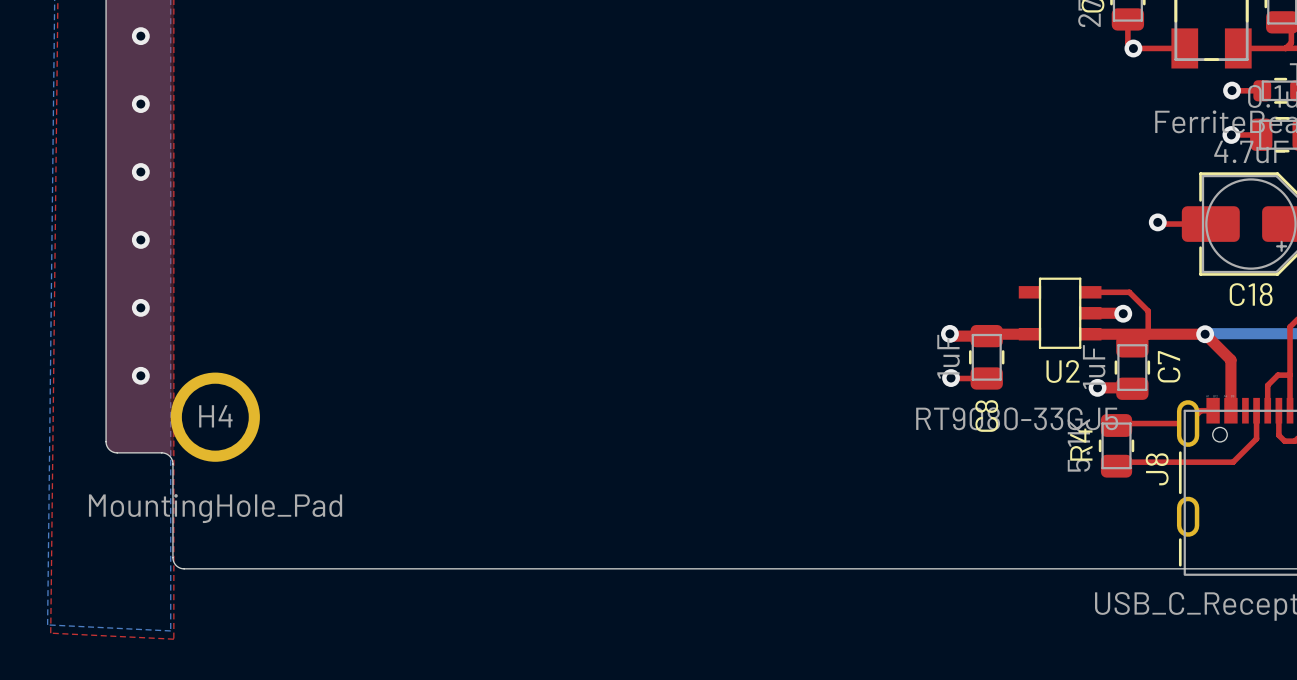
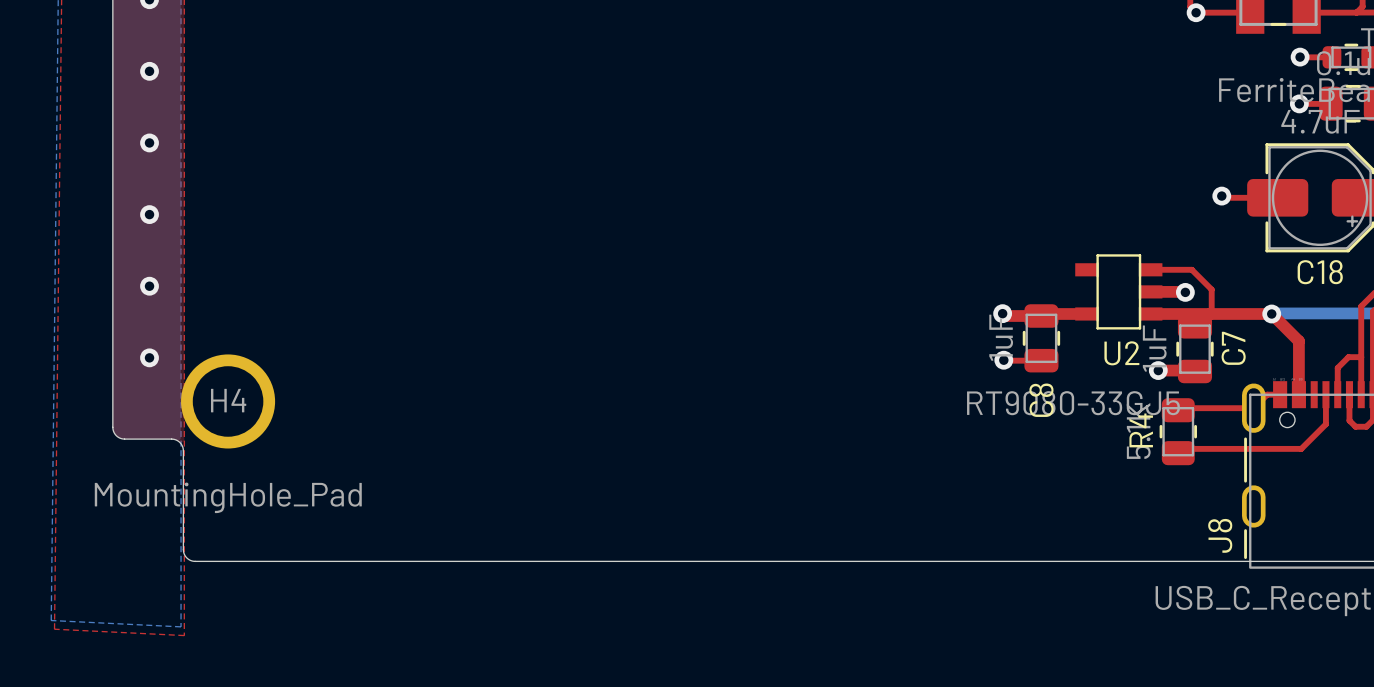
J8 name position: J8 (1157, 469) -> J8 (1220, 535)

